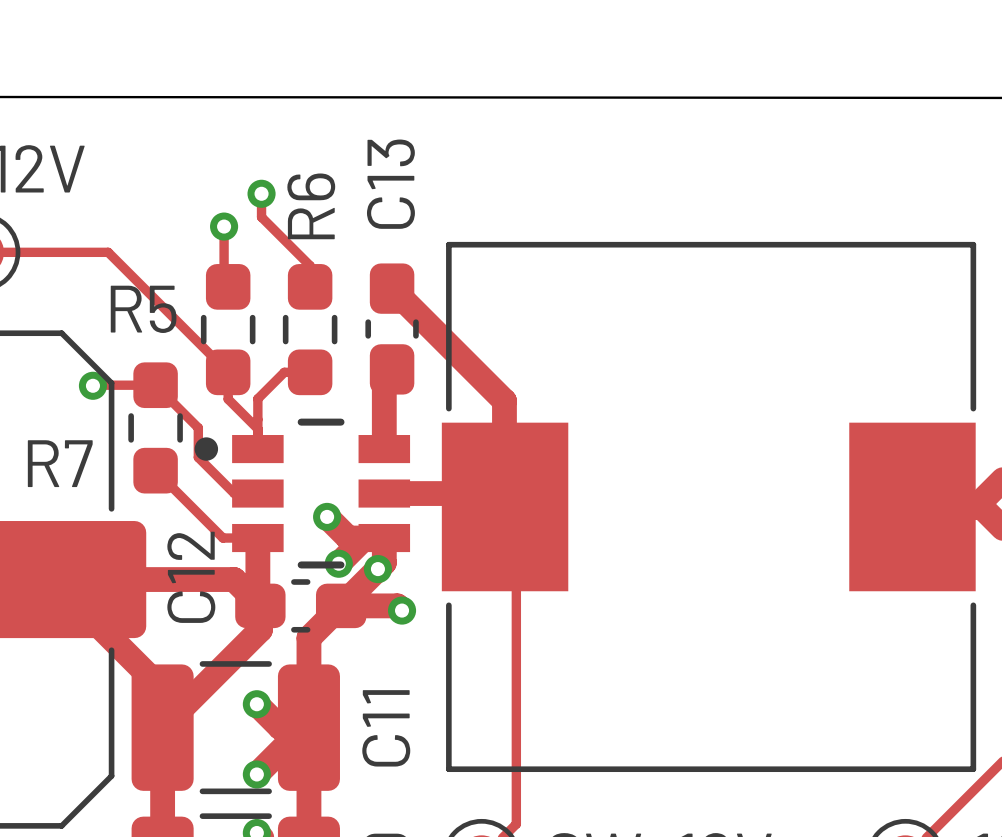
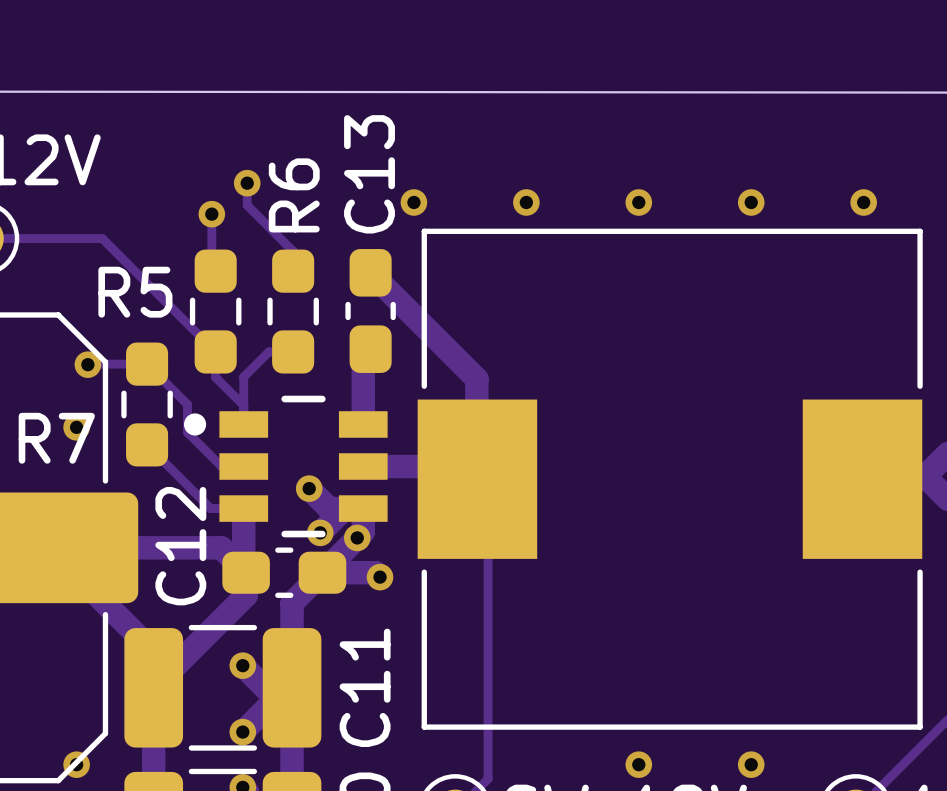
via: none -> (413, 202)
via: none -> (526, 202)
via: none -> (638, 202)
via: none -> (751, 202)
via: none -> (863, 202)
via: none -> (76, 427)
via: none -> (76, 764)
via: none -> (638, 764)
via: none -> (751, 764)

